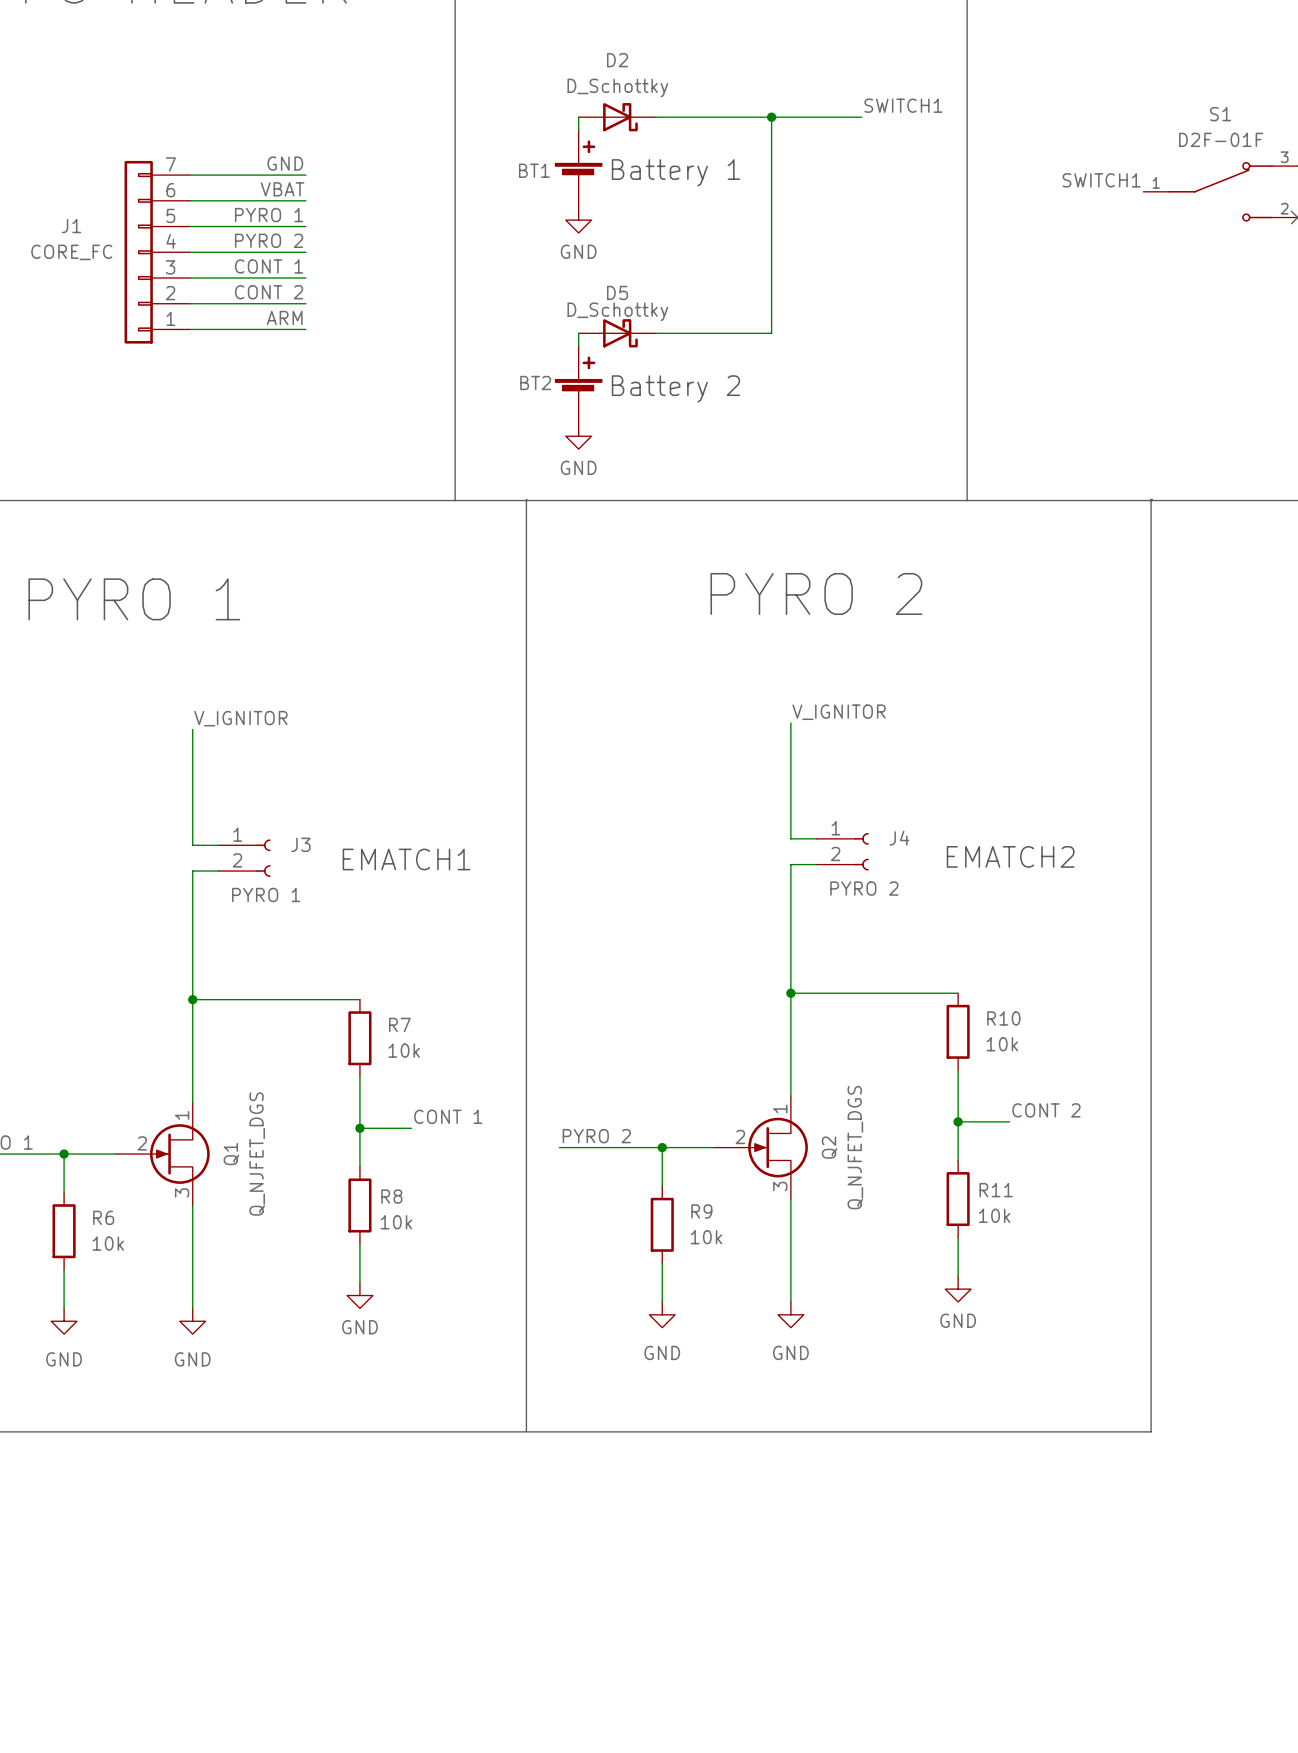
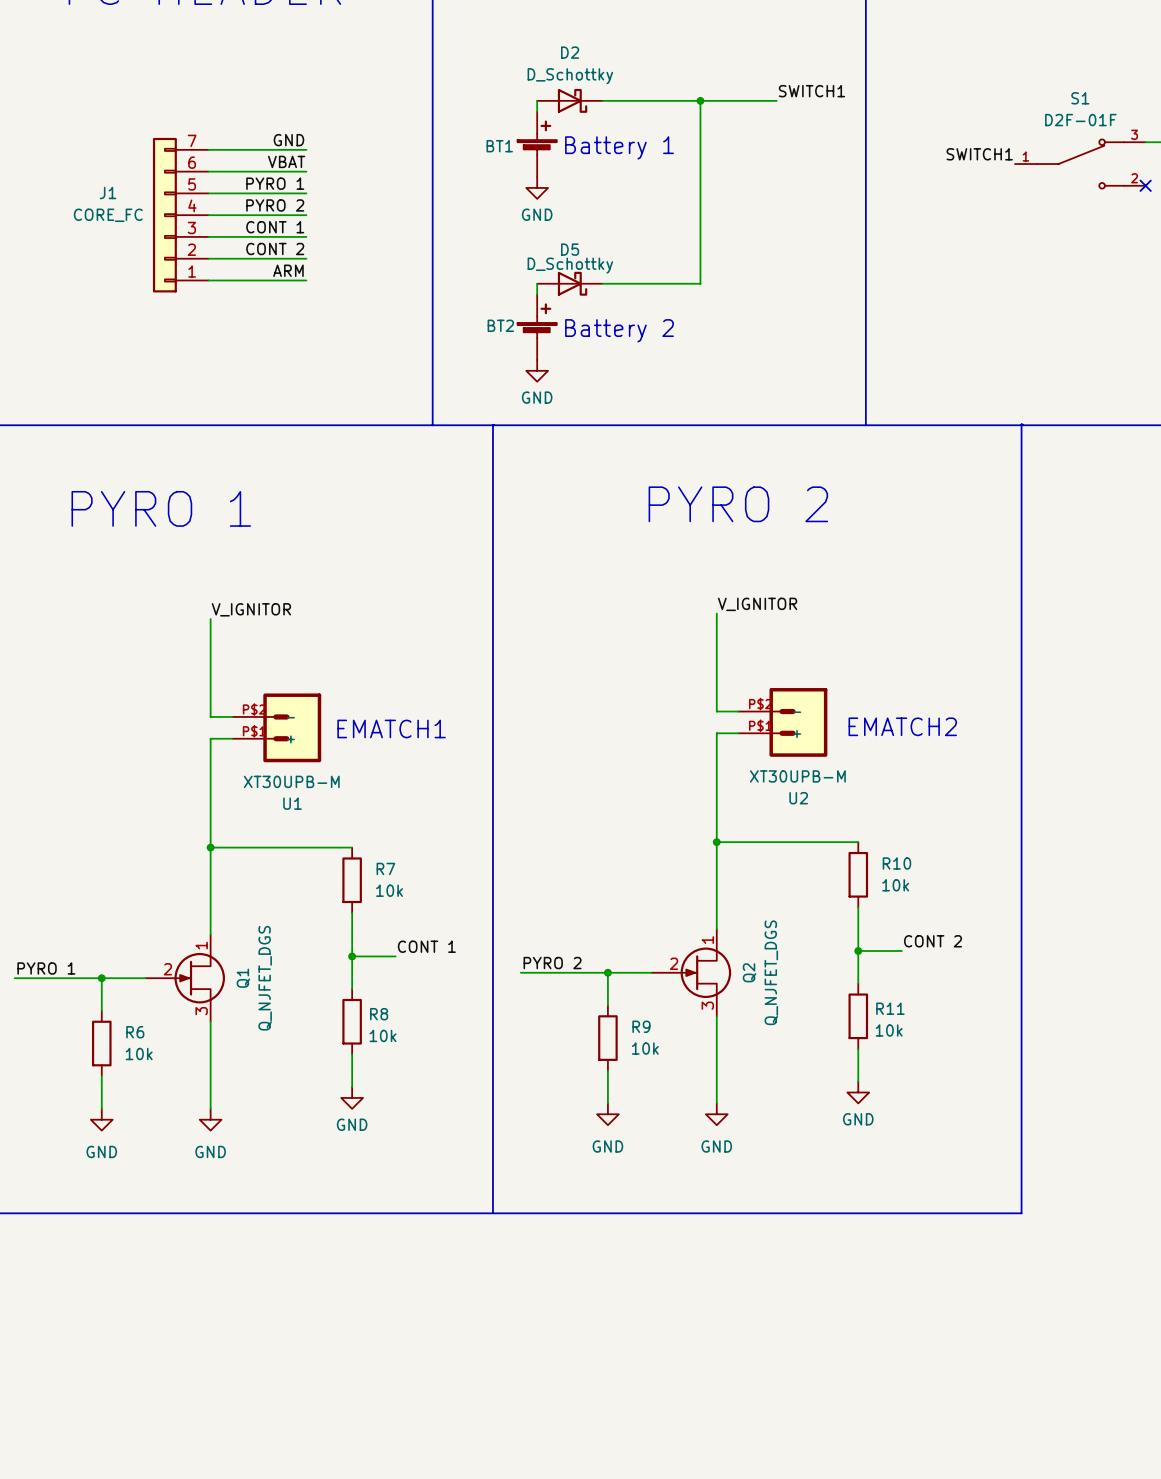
J4: PYRO 2 (842, 851) -> none
U2: none -> XT30UPB-M (782, 722)
J3: PYRO 1 (244, 858) -> none
U1: none -> XT30UPB-M (276, 727)

